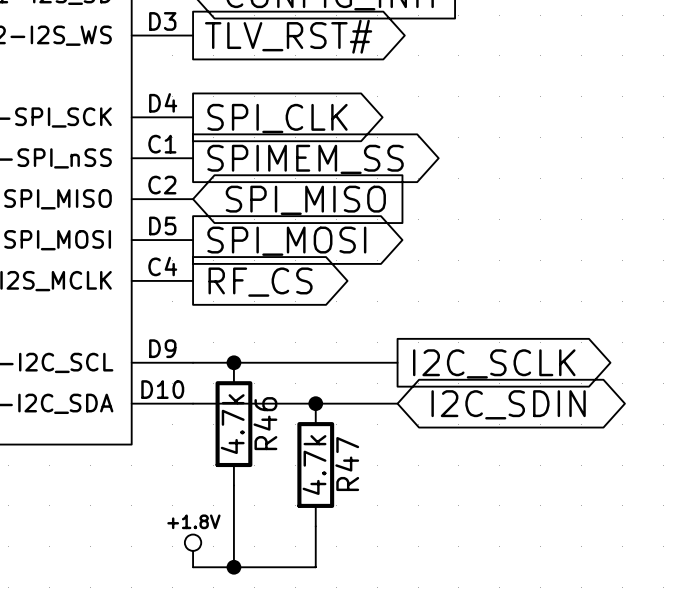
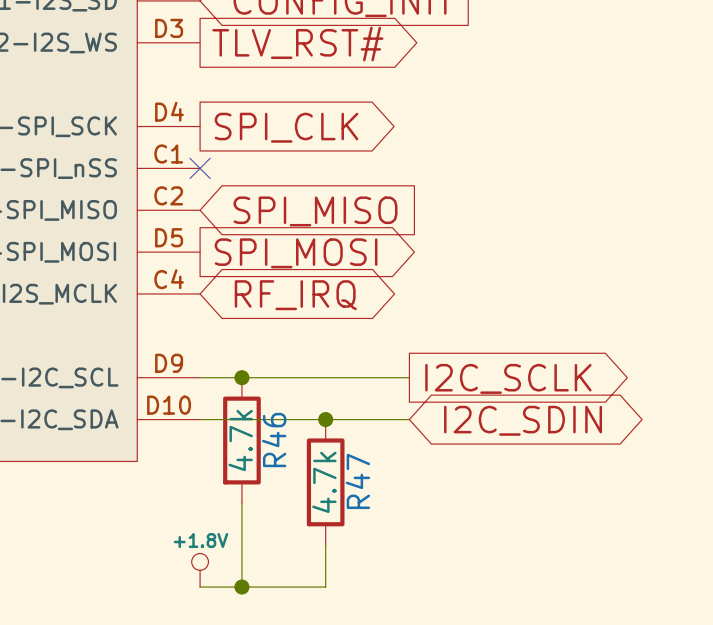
no-connect mark: none -> (200, 168)
global label: SPIMEM_SS (305, 159) -> none
global label shape: output (260, 282) -> bidirectional (295, 295)
global label: RF_CS (260, 282) -> RF_IRQ (295, 295)

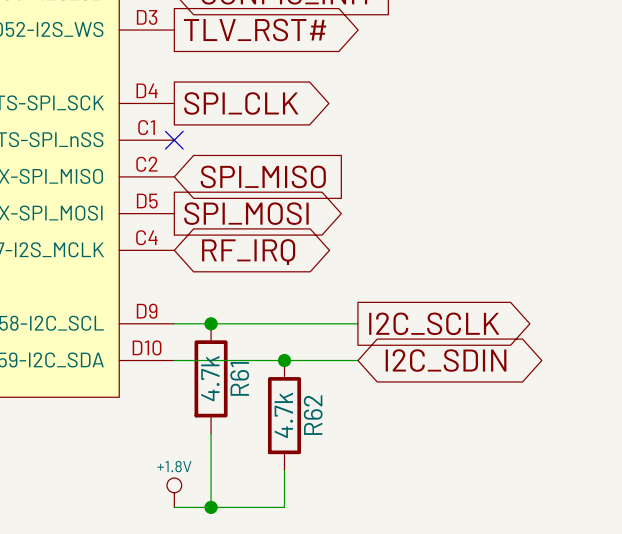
R46 name: R46 (274, 440) -> R61 (239, 378)
R47 name: R47 (357, 481) -> R62 (313, 415)

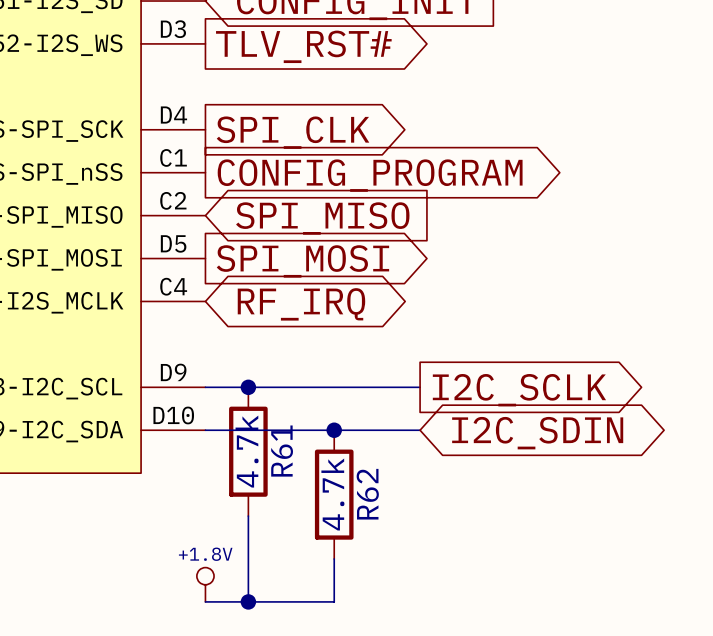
no-connect mark: (174, 140) -> none
global label: none -> CONFIG_PROGRAM (370, 175)

